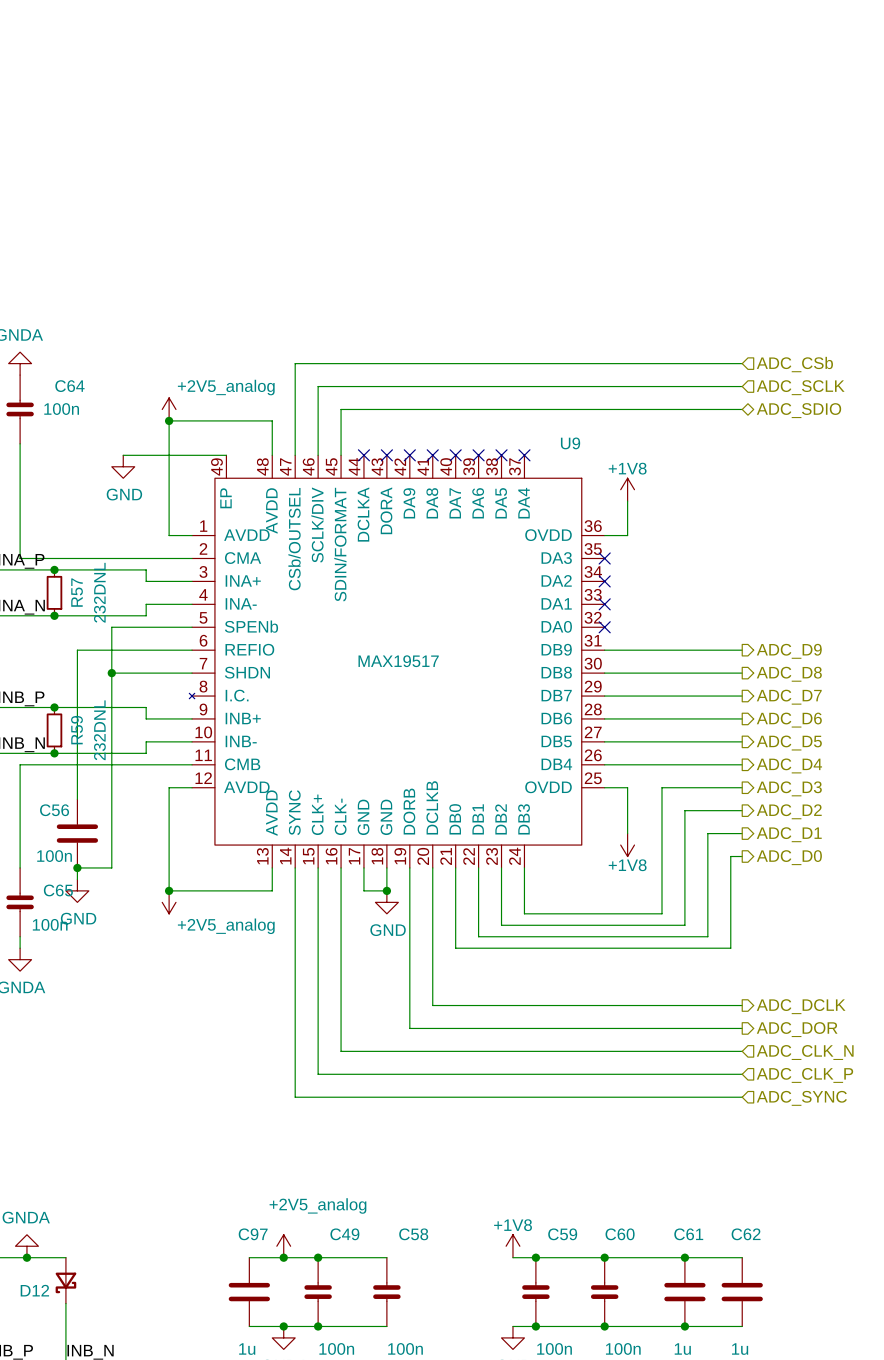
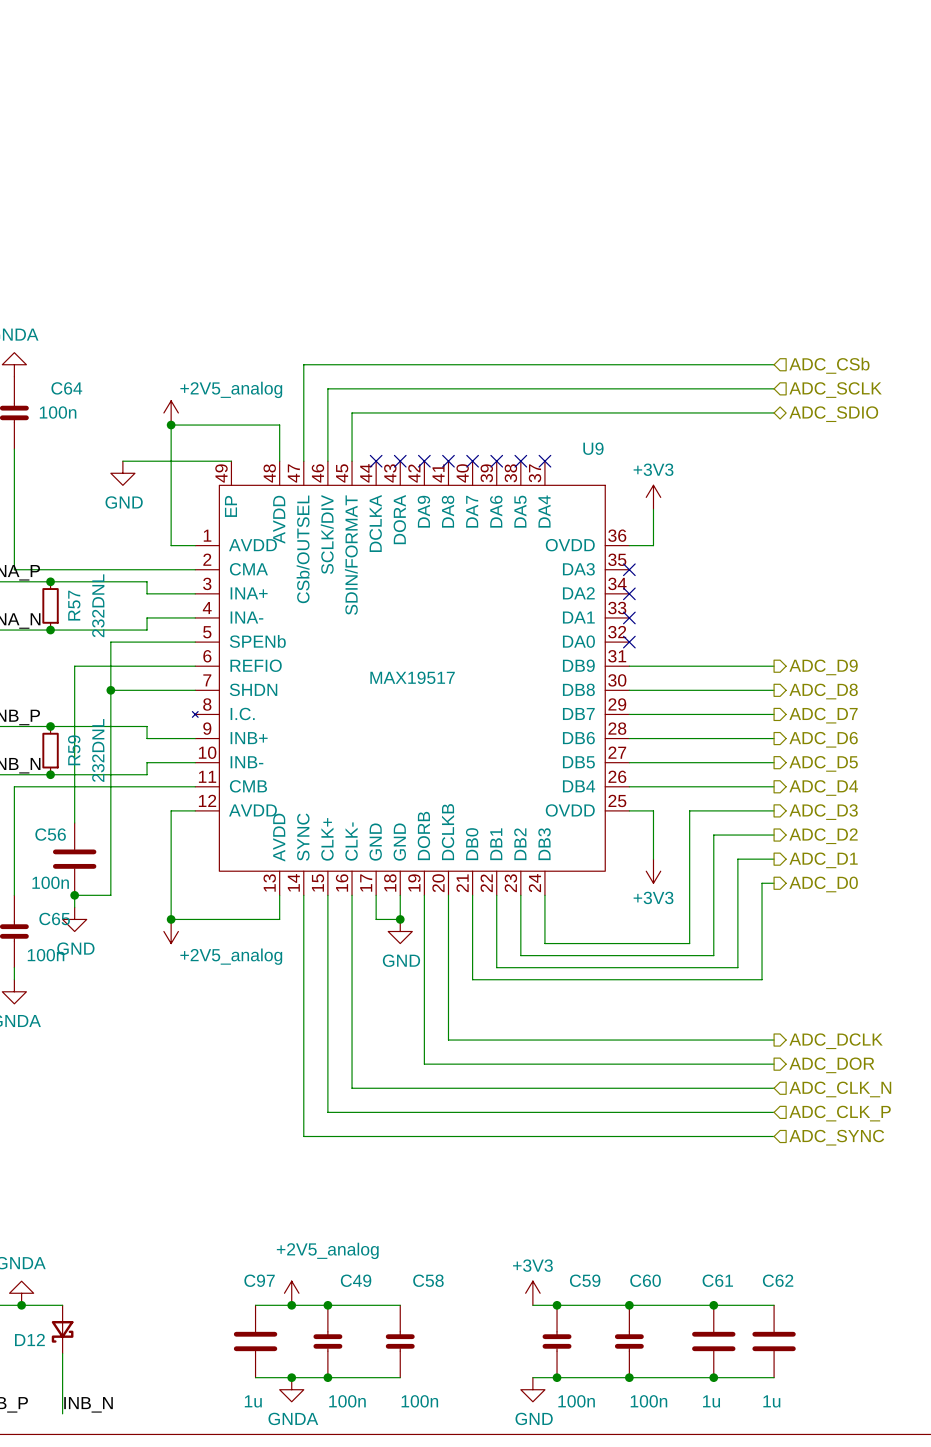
power symbol: +1V8 (627, 489) -> +3V3 (653, 497)
power symbol: +1V8 (627, 845) -> +3V3 (653, 871)
power symbol: +1V8 (512, 1246) -> +3V3 (532, 1293)

